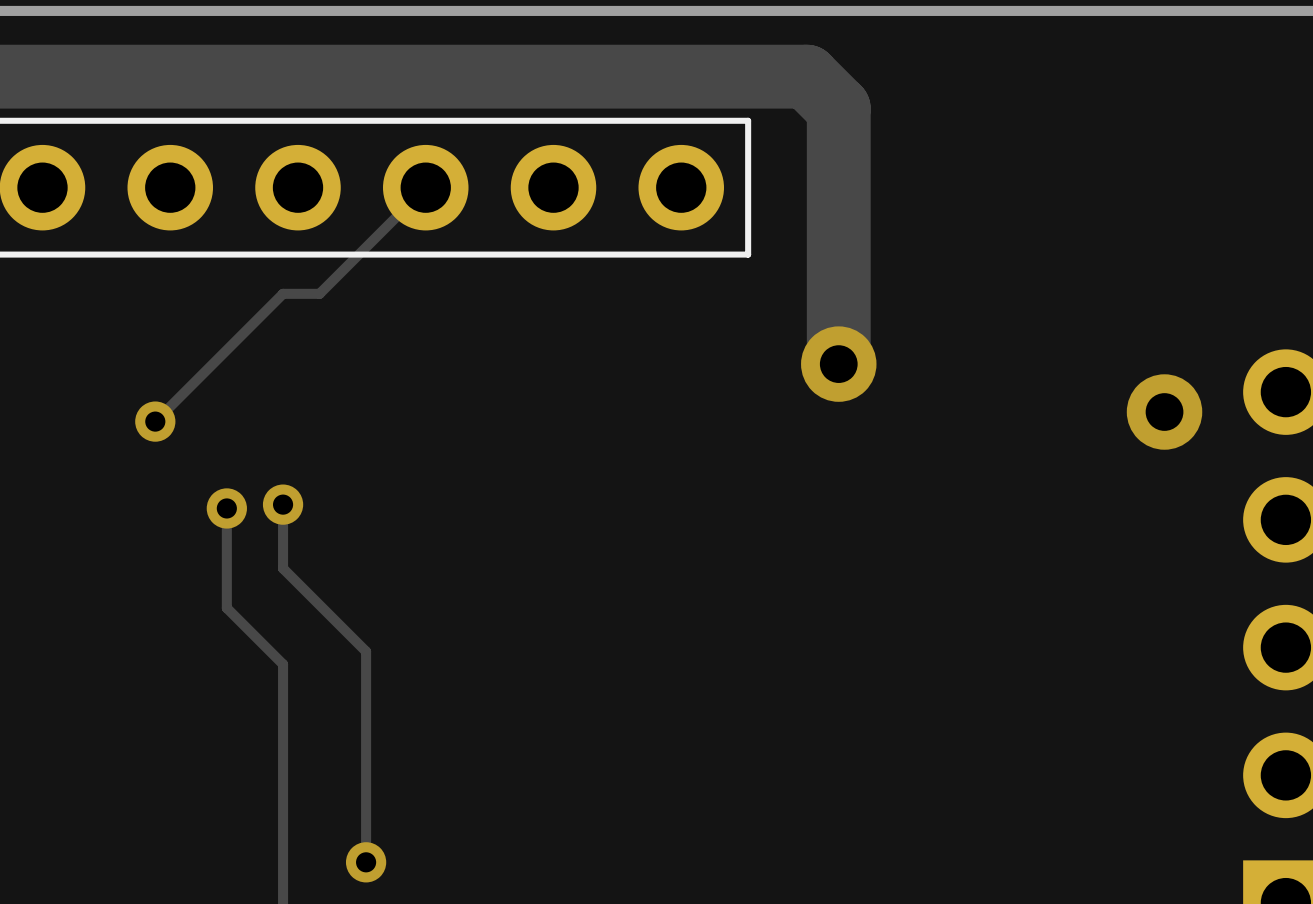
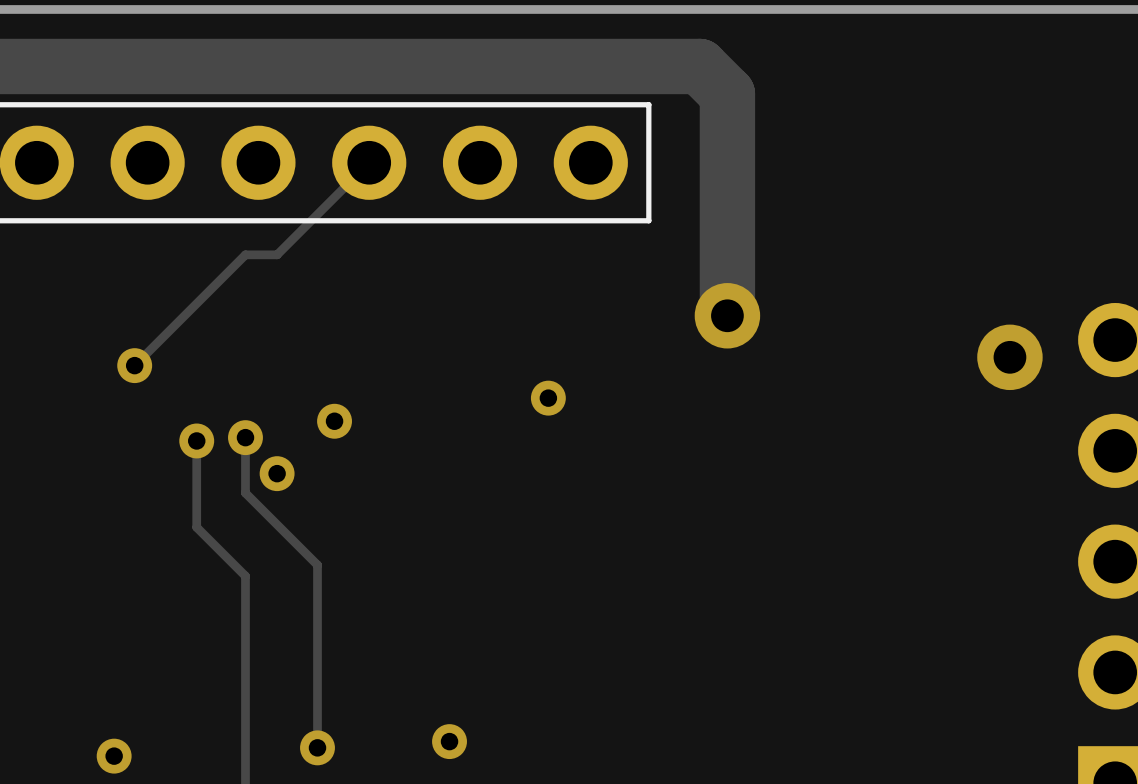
via: none -> (548, 398)
via: none -> (334, 421)
via: none -> (277, 473)
via: none -> (449, 741)
via: none -> (114, 756)

